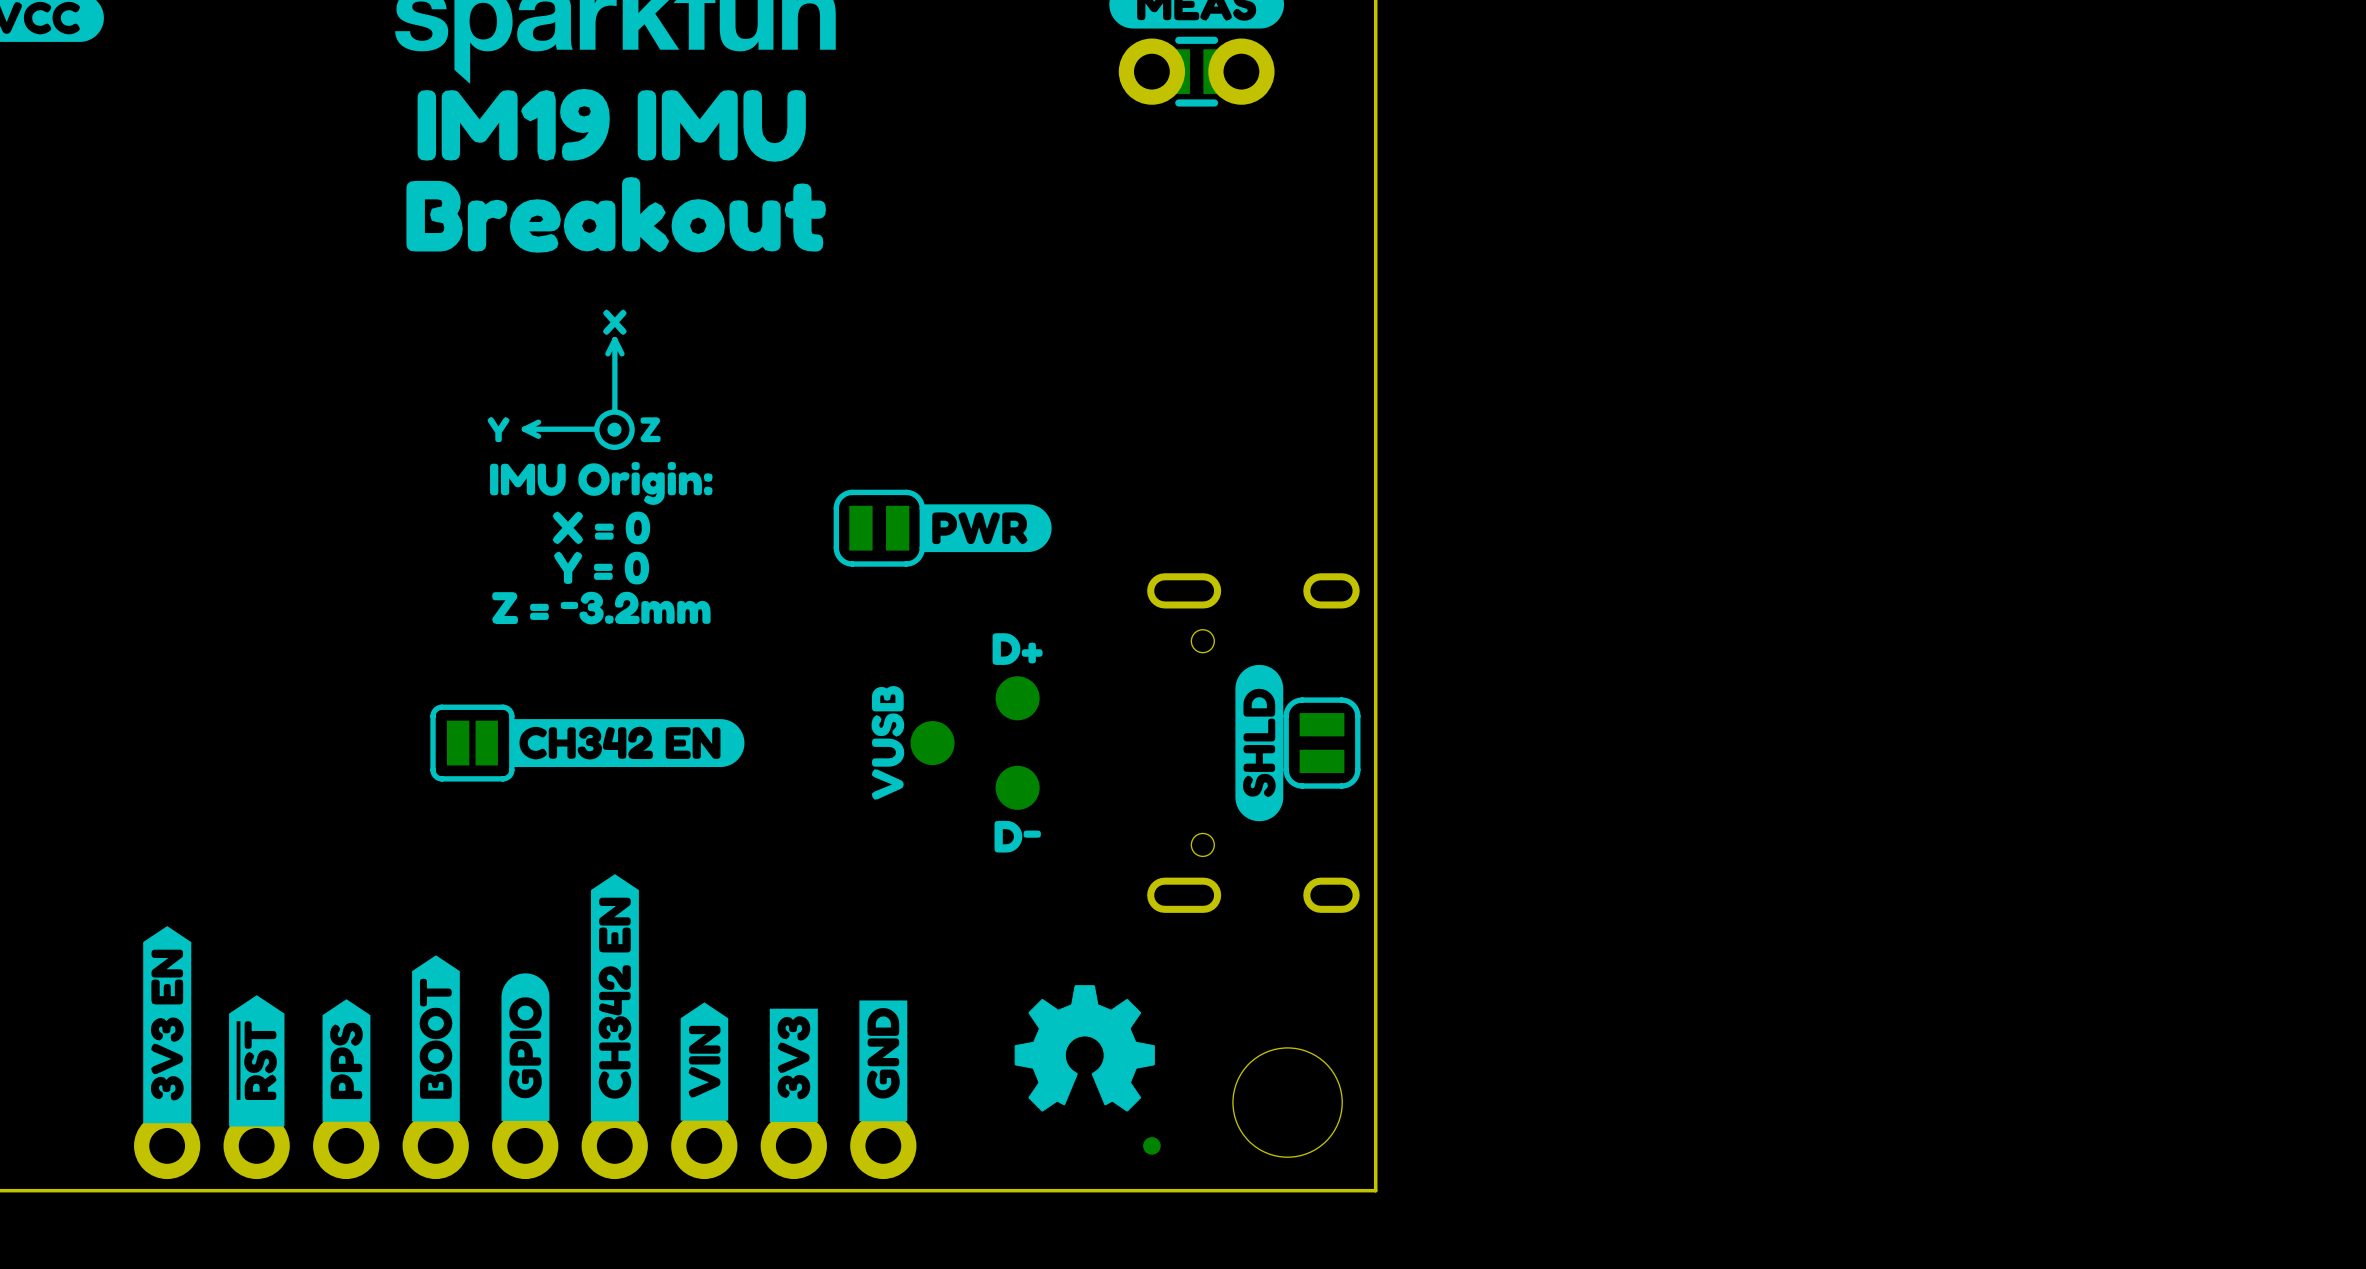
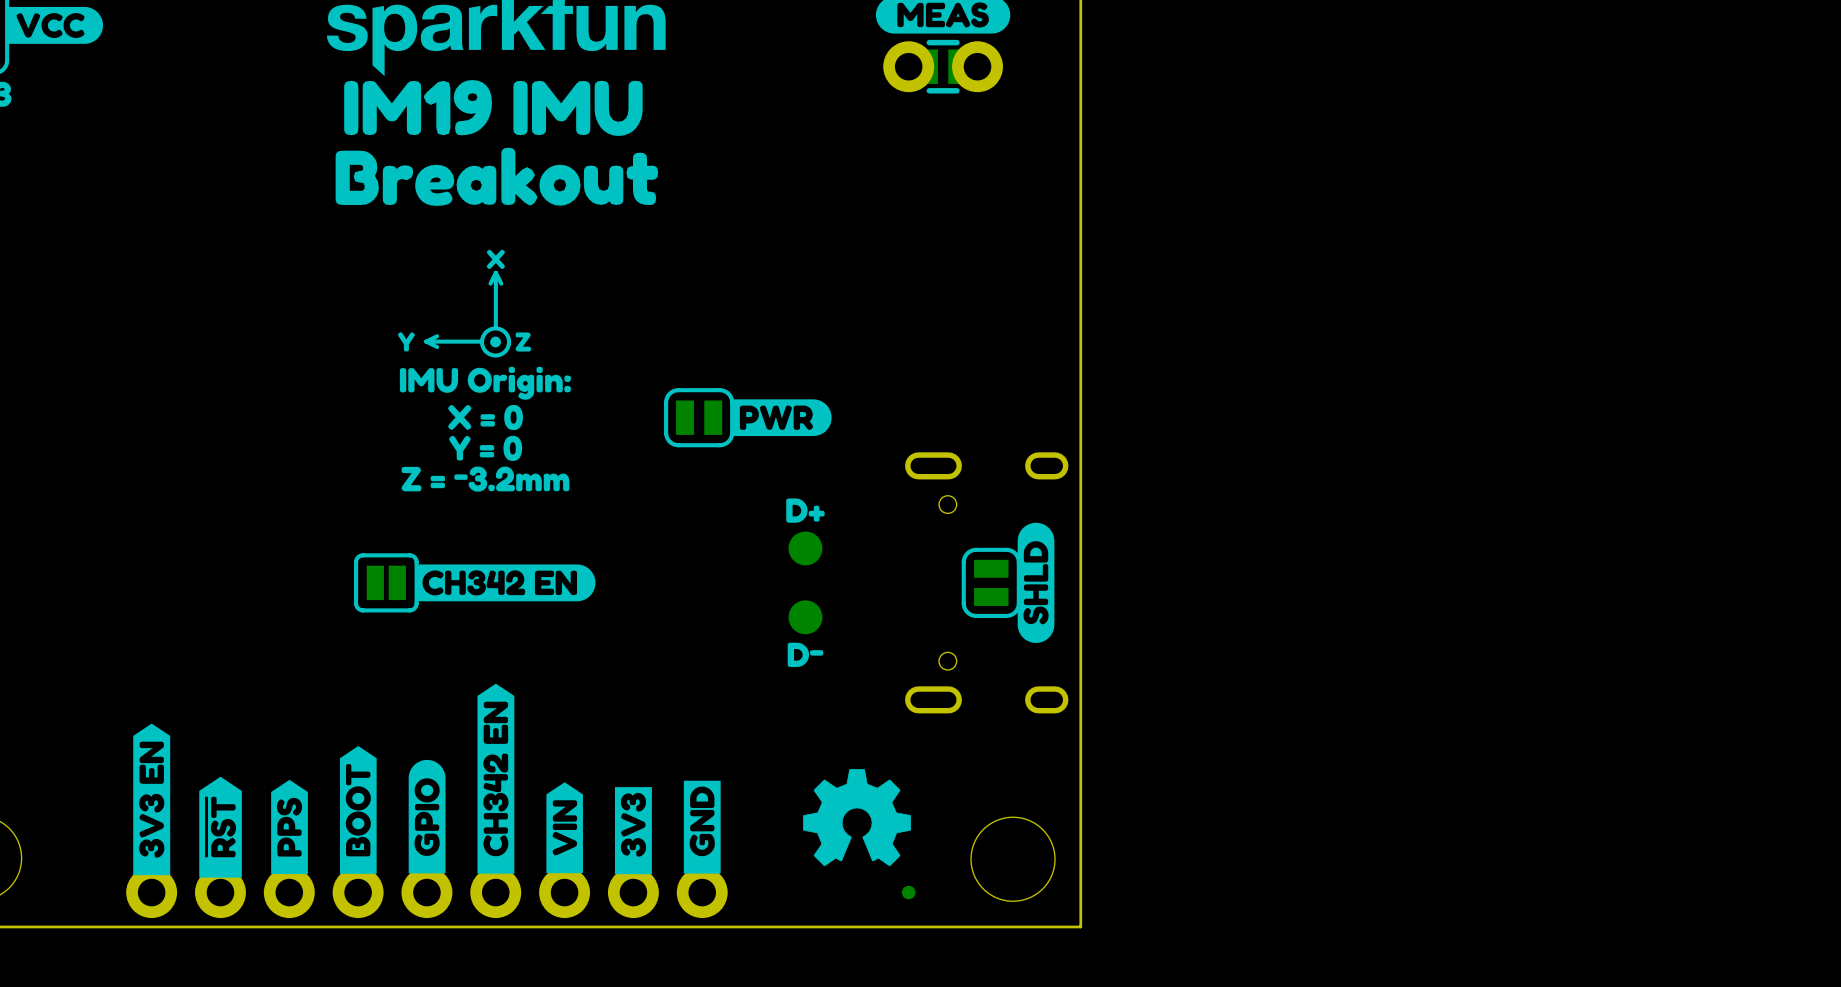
drawing: [871, 686, 905, 800] -> none
part: (932, 743) -> none
drawing position: (1259, 743) -> (1036, 582)
part position: (1321, 743) -> (991, 582)

